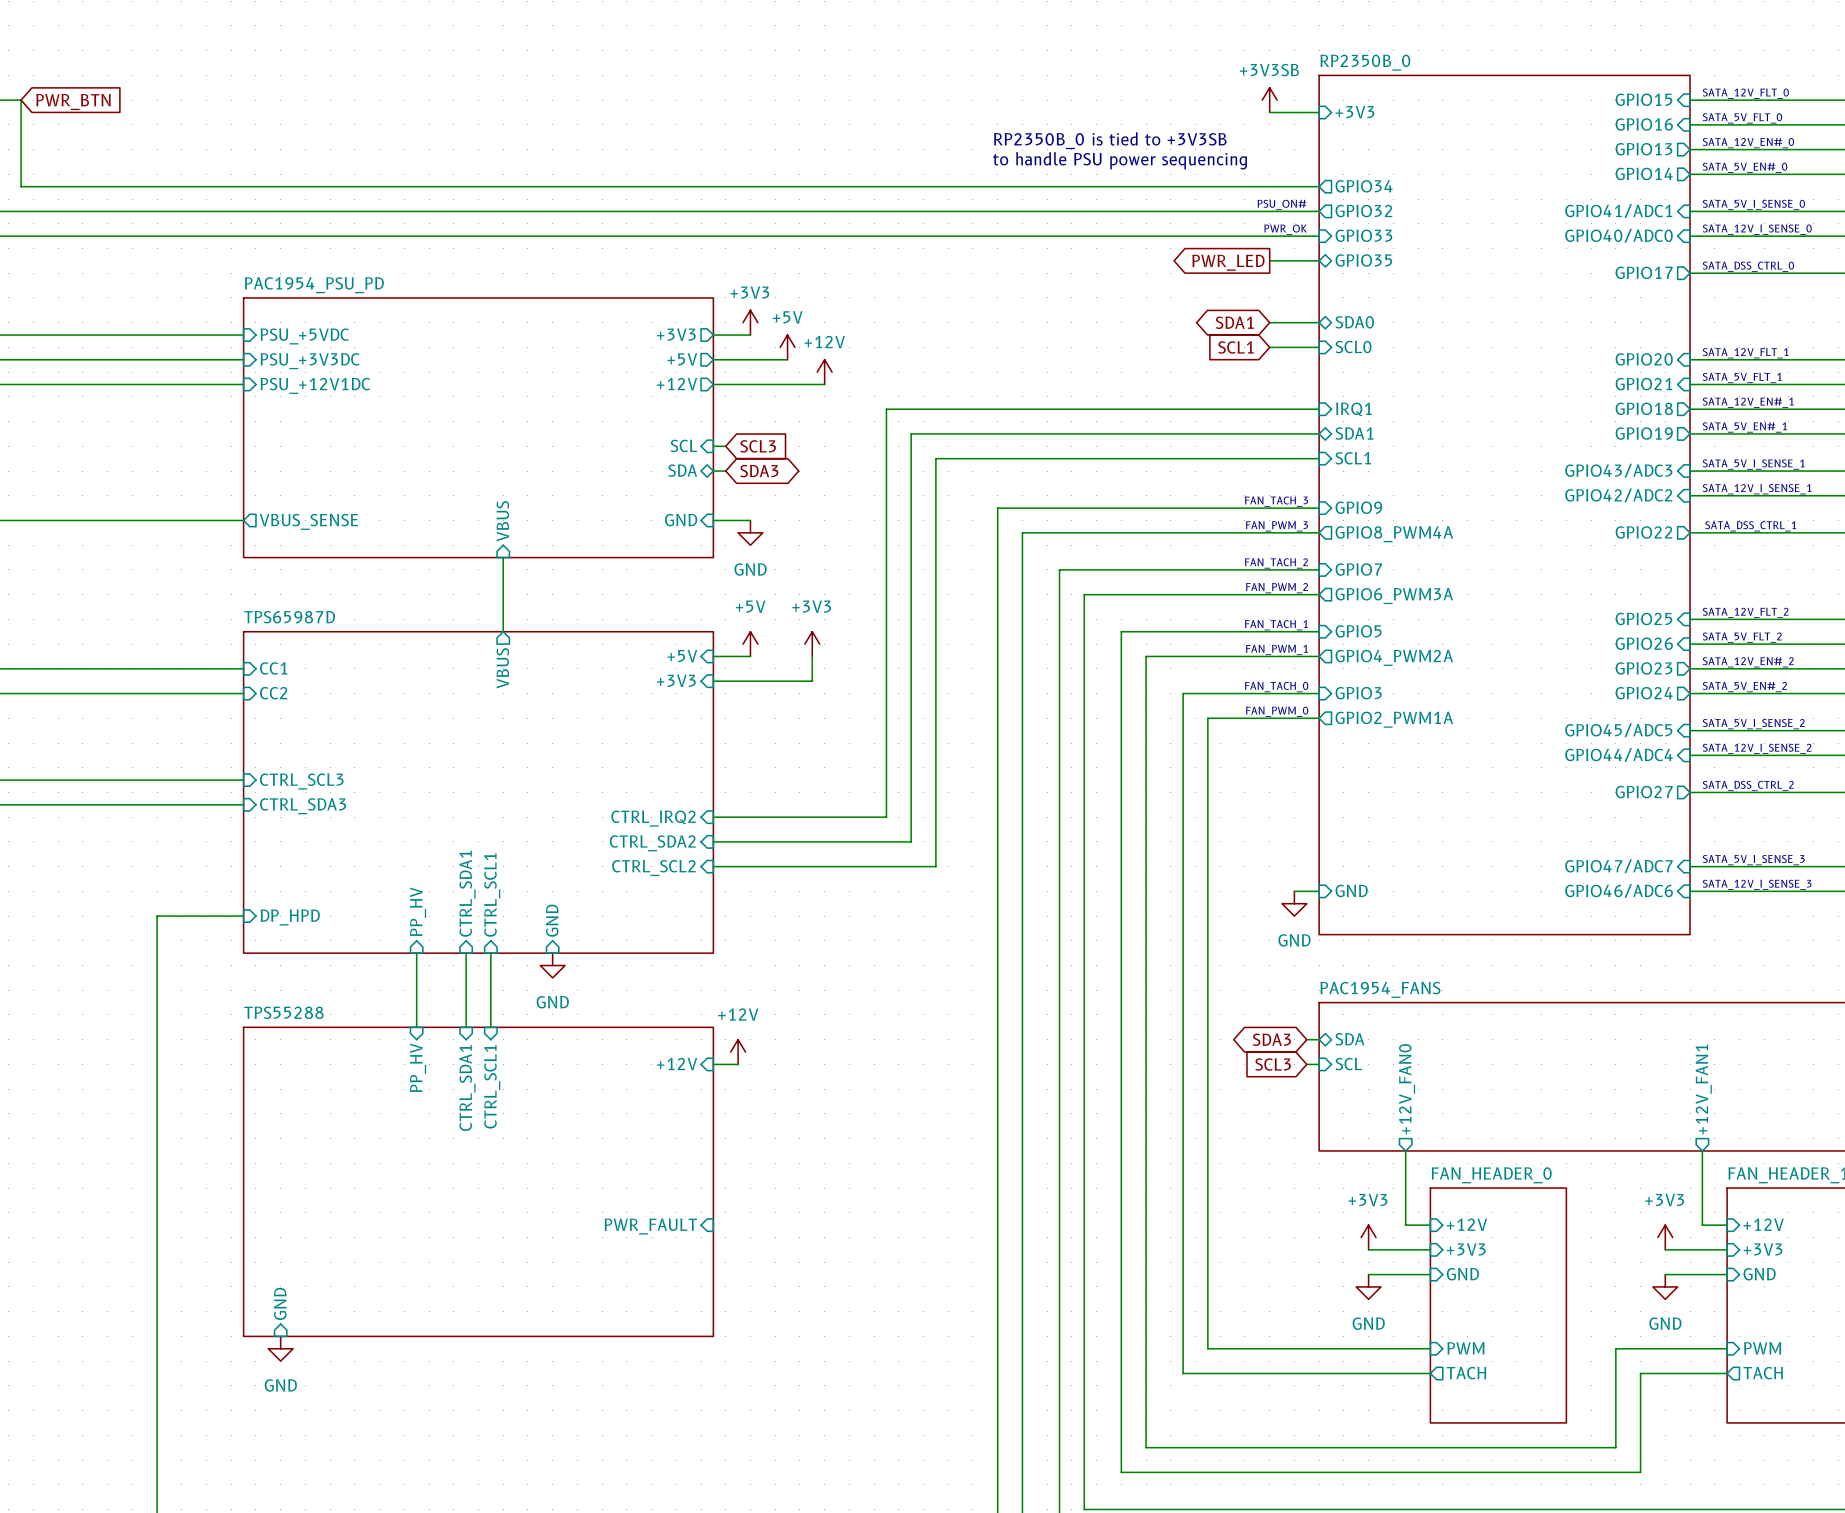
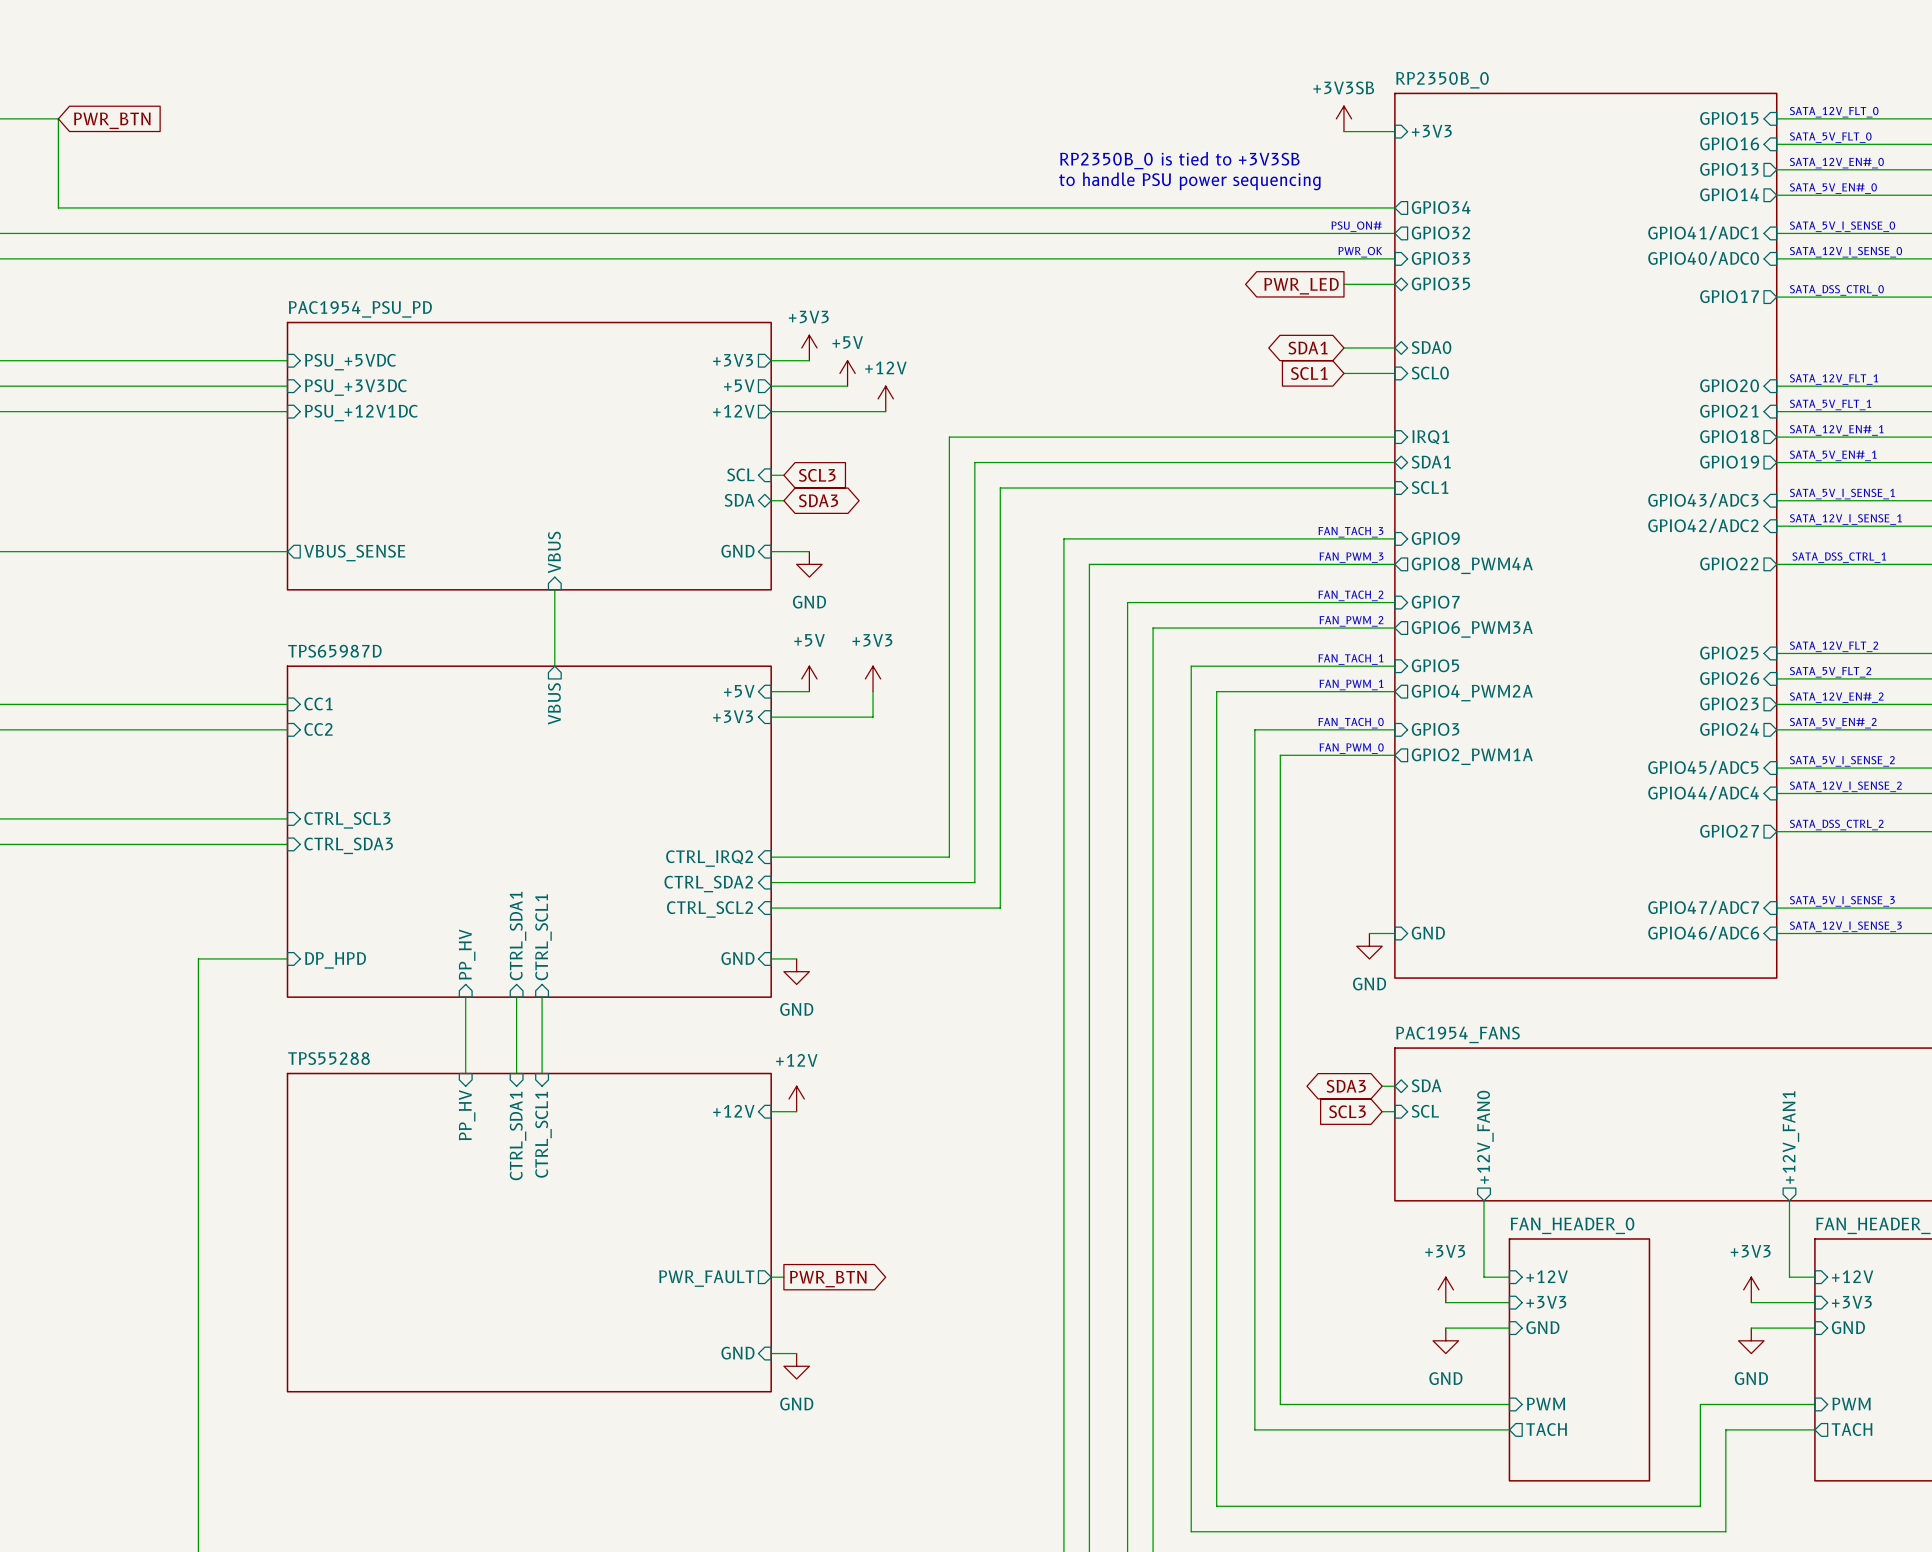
wire: none -> (771, 958) (796, 958)
sheet pin rotation: 0° (552, 920) -> 90° counterclockwise (737, 958)
sheet pin position: GND (552, 920) -> GND (737, 958)
power symbol position: GND (552, 965) -> GND (796, 971)
wire: none -> (771, 1277) (783, 1277)
sheet pin shape: input (650, 1226) -> output (706, 1278)
global label: none -> PWR_BTN (828, 1279)
sheet pin: none -> GND (737, 1353)
wire: none -> (771, 1353) (796, 1353)
sheet pin: GND (280, 1303) -> none
power symbol: none -> GND (796, 1366)
power symbol: GND (280, 1348) -> none

